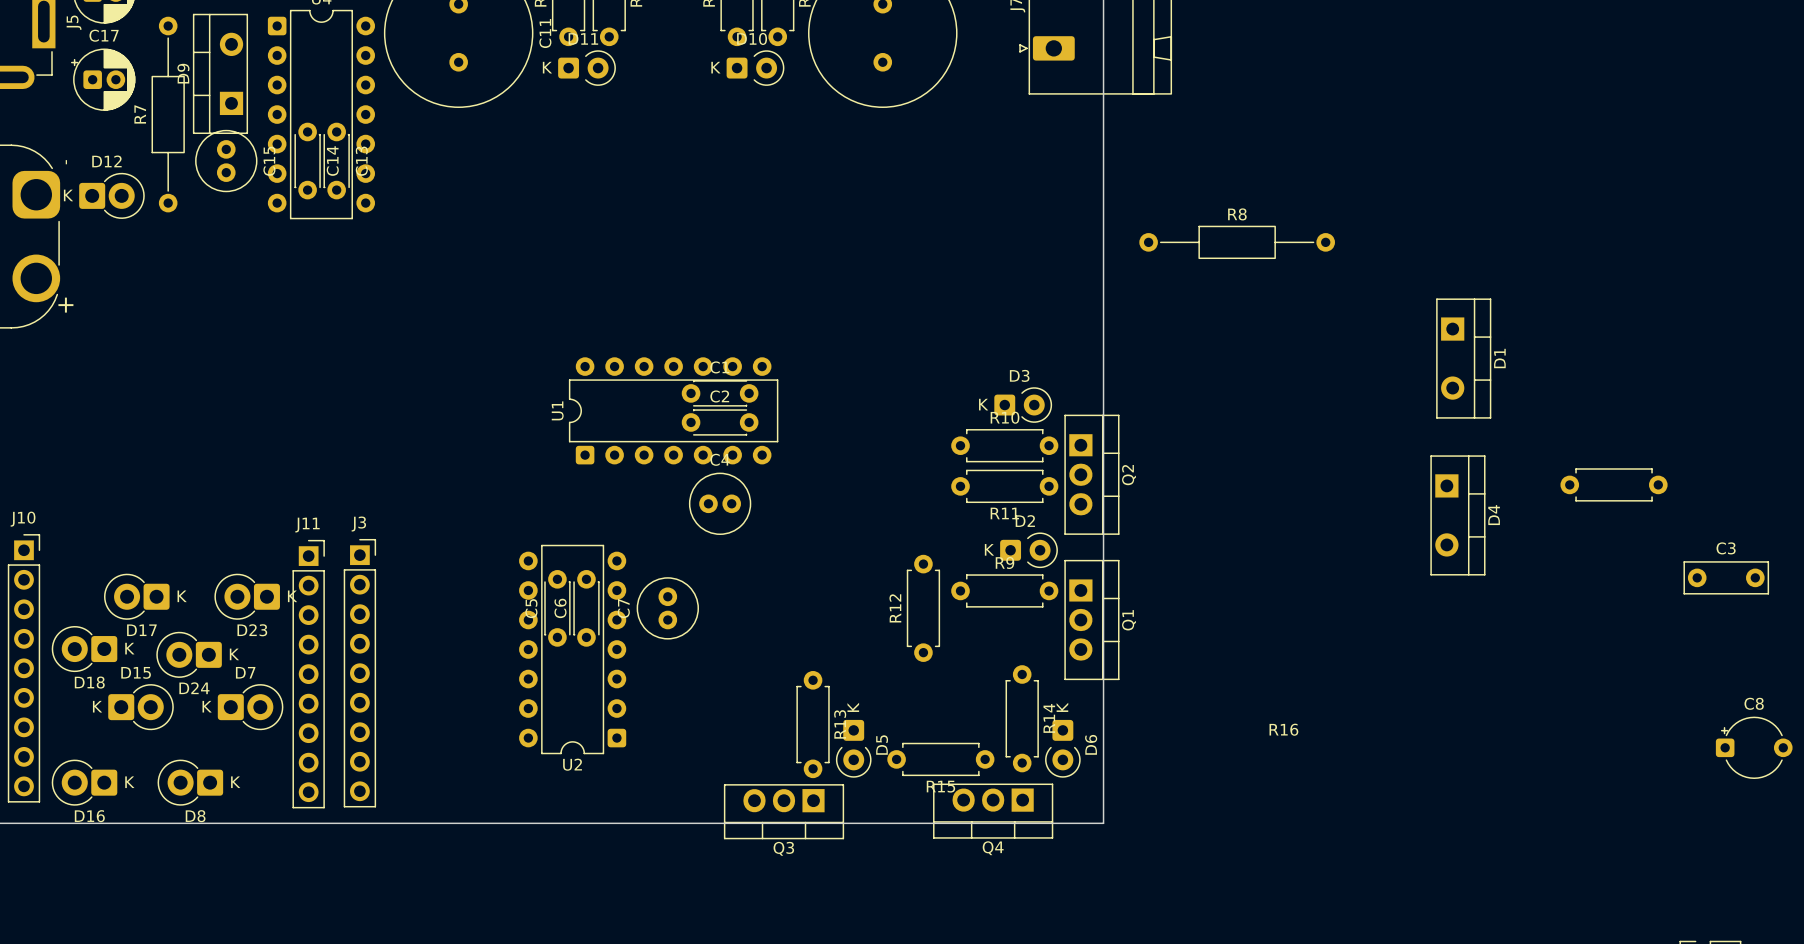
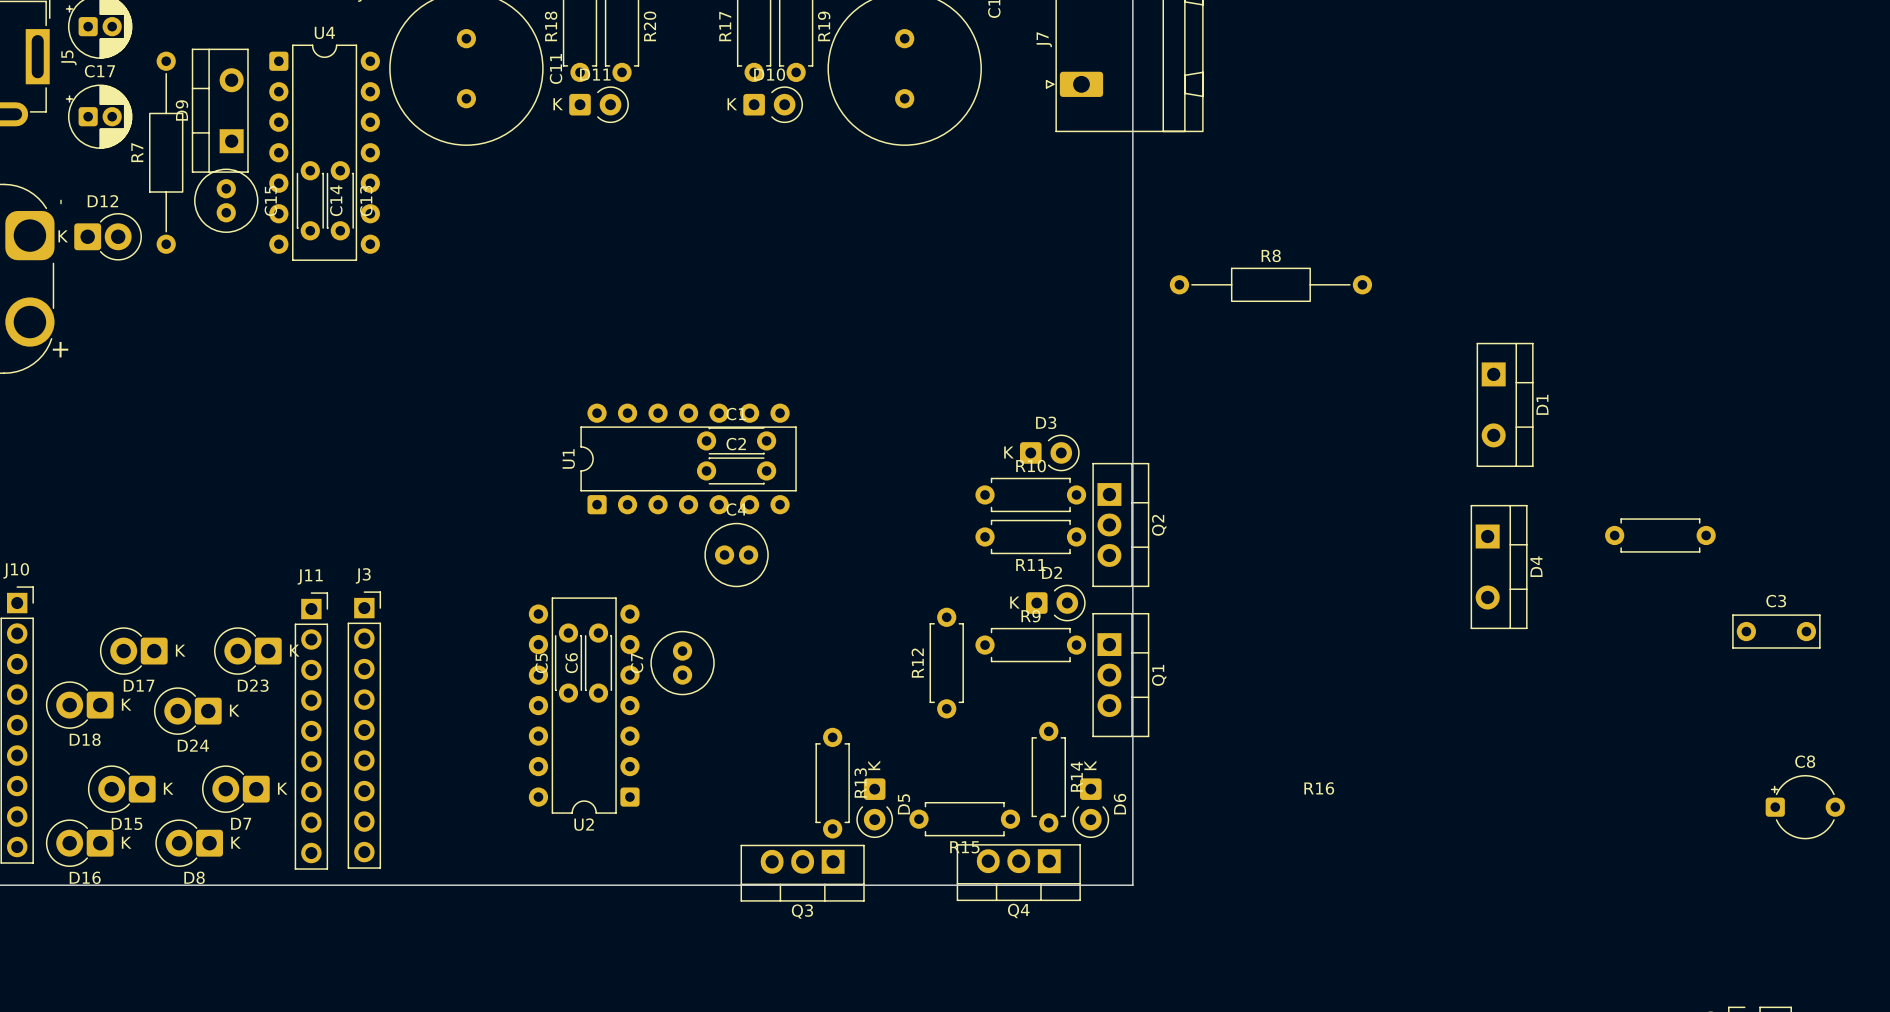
D15 rotation: 0° (140, 707) -> 180° (121, 789)
D7 rotation: 0° (250, 707) -> 180° (235, 789)

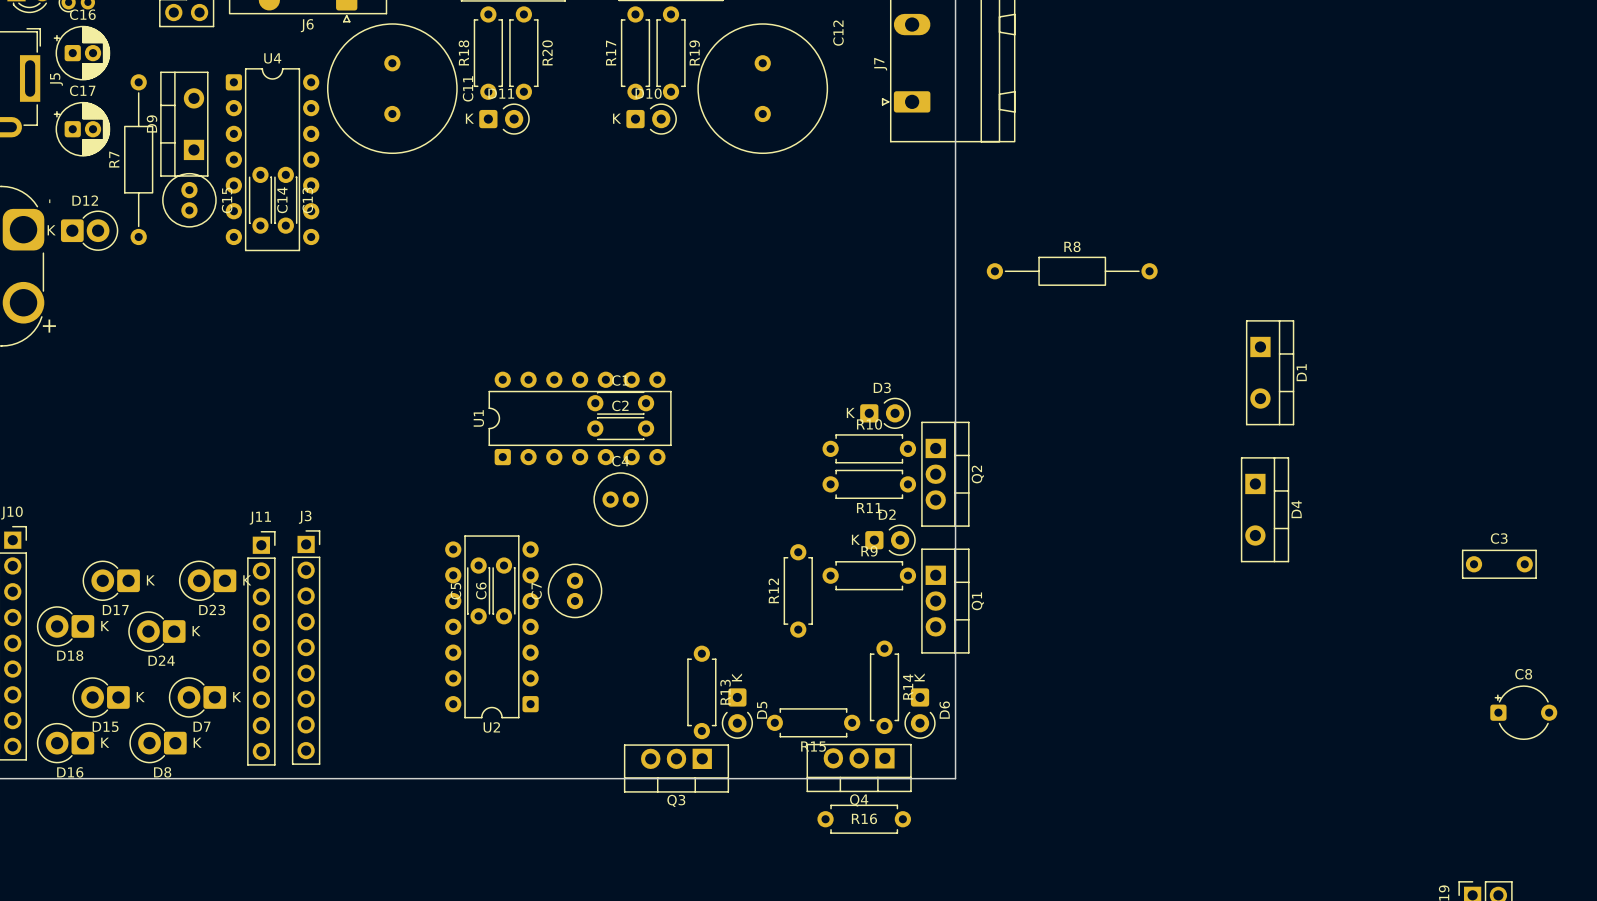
R16 position: (1660, 535) -> (864, 819)
R16 name position: R16 (1319, 788) -> R16 (864, 818)

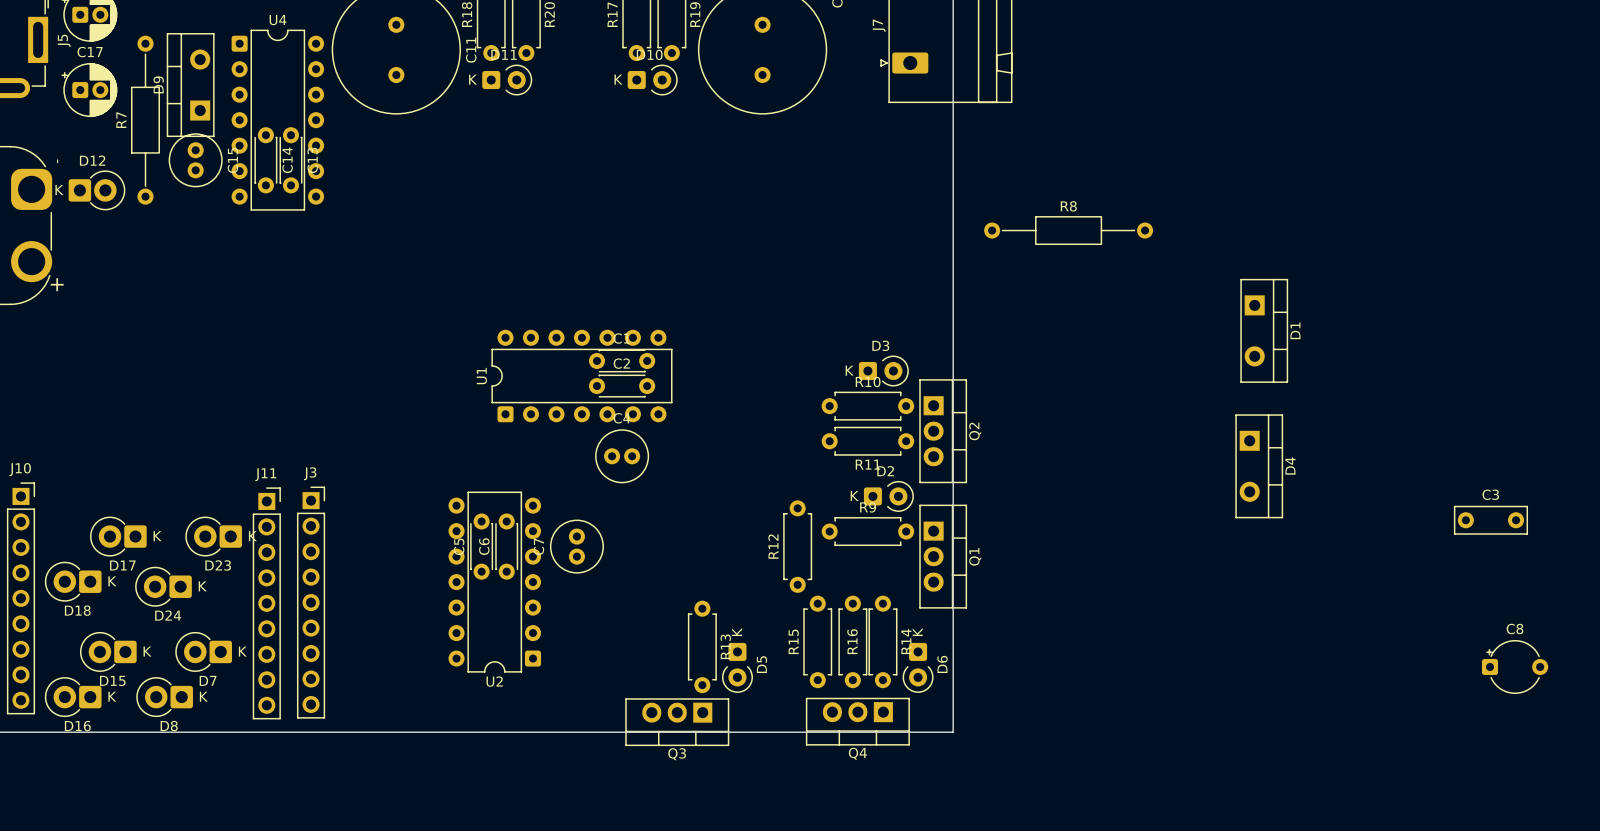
R15 rotation: 0° (813, 722) -> 90° clockwise (817, 641)
R16 rotation: 0° (864, 819) -> 90° clockwise (852, 641)
R16 position: (864, 819) -> (852, 641)

